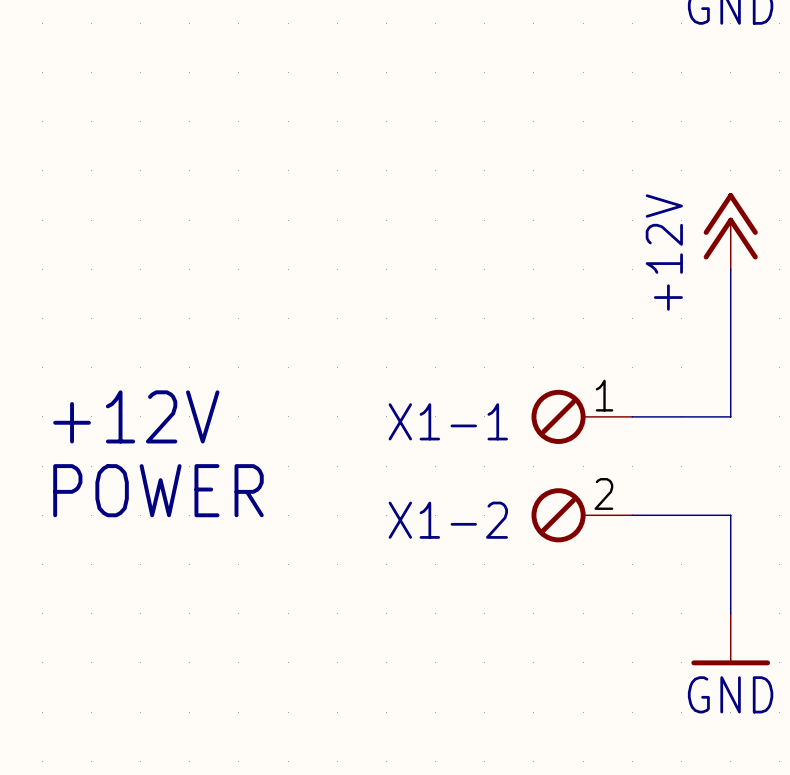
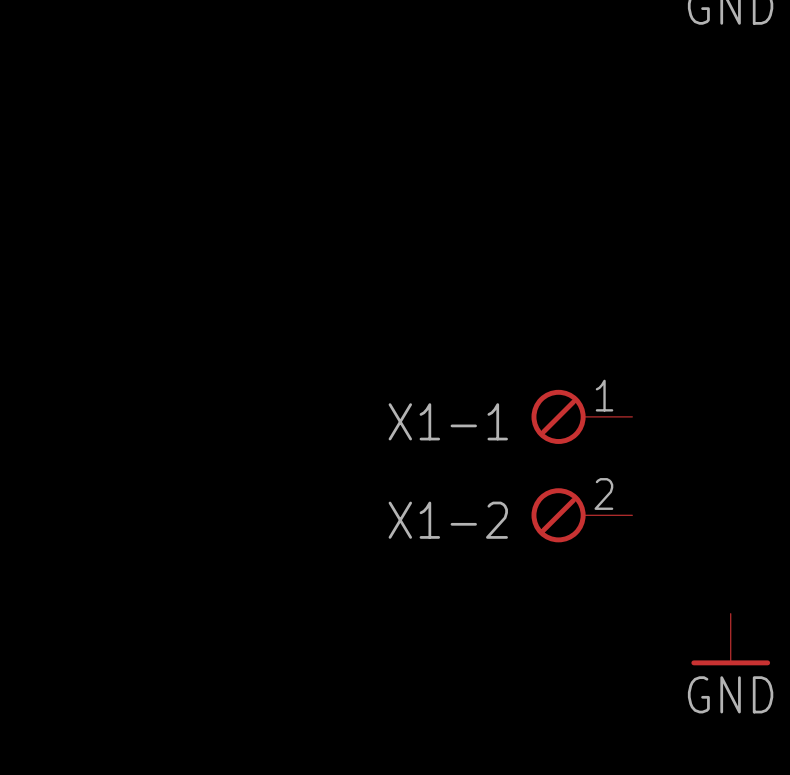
power symbol: +12V (730, 231) -> none
wire: (730, 269) (730, 416) (632, 416) -> none
text: +12V (136, 416) -> none
text: POWER (158, 490) -> none
wire: (632, 515) (730, 515) (730, 613) -> none

